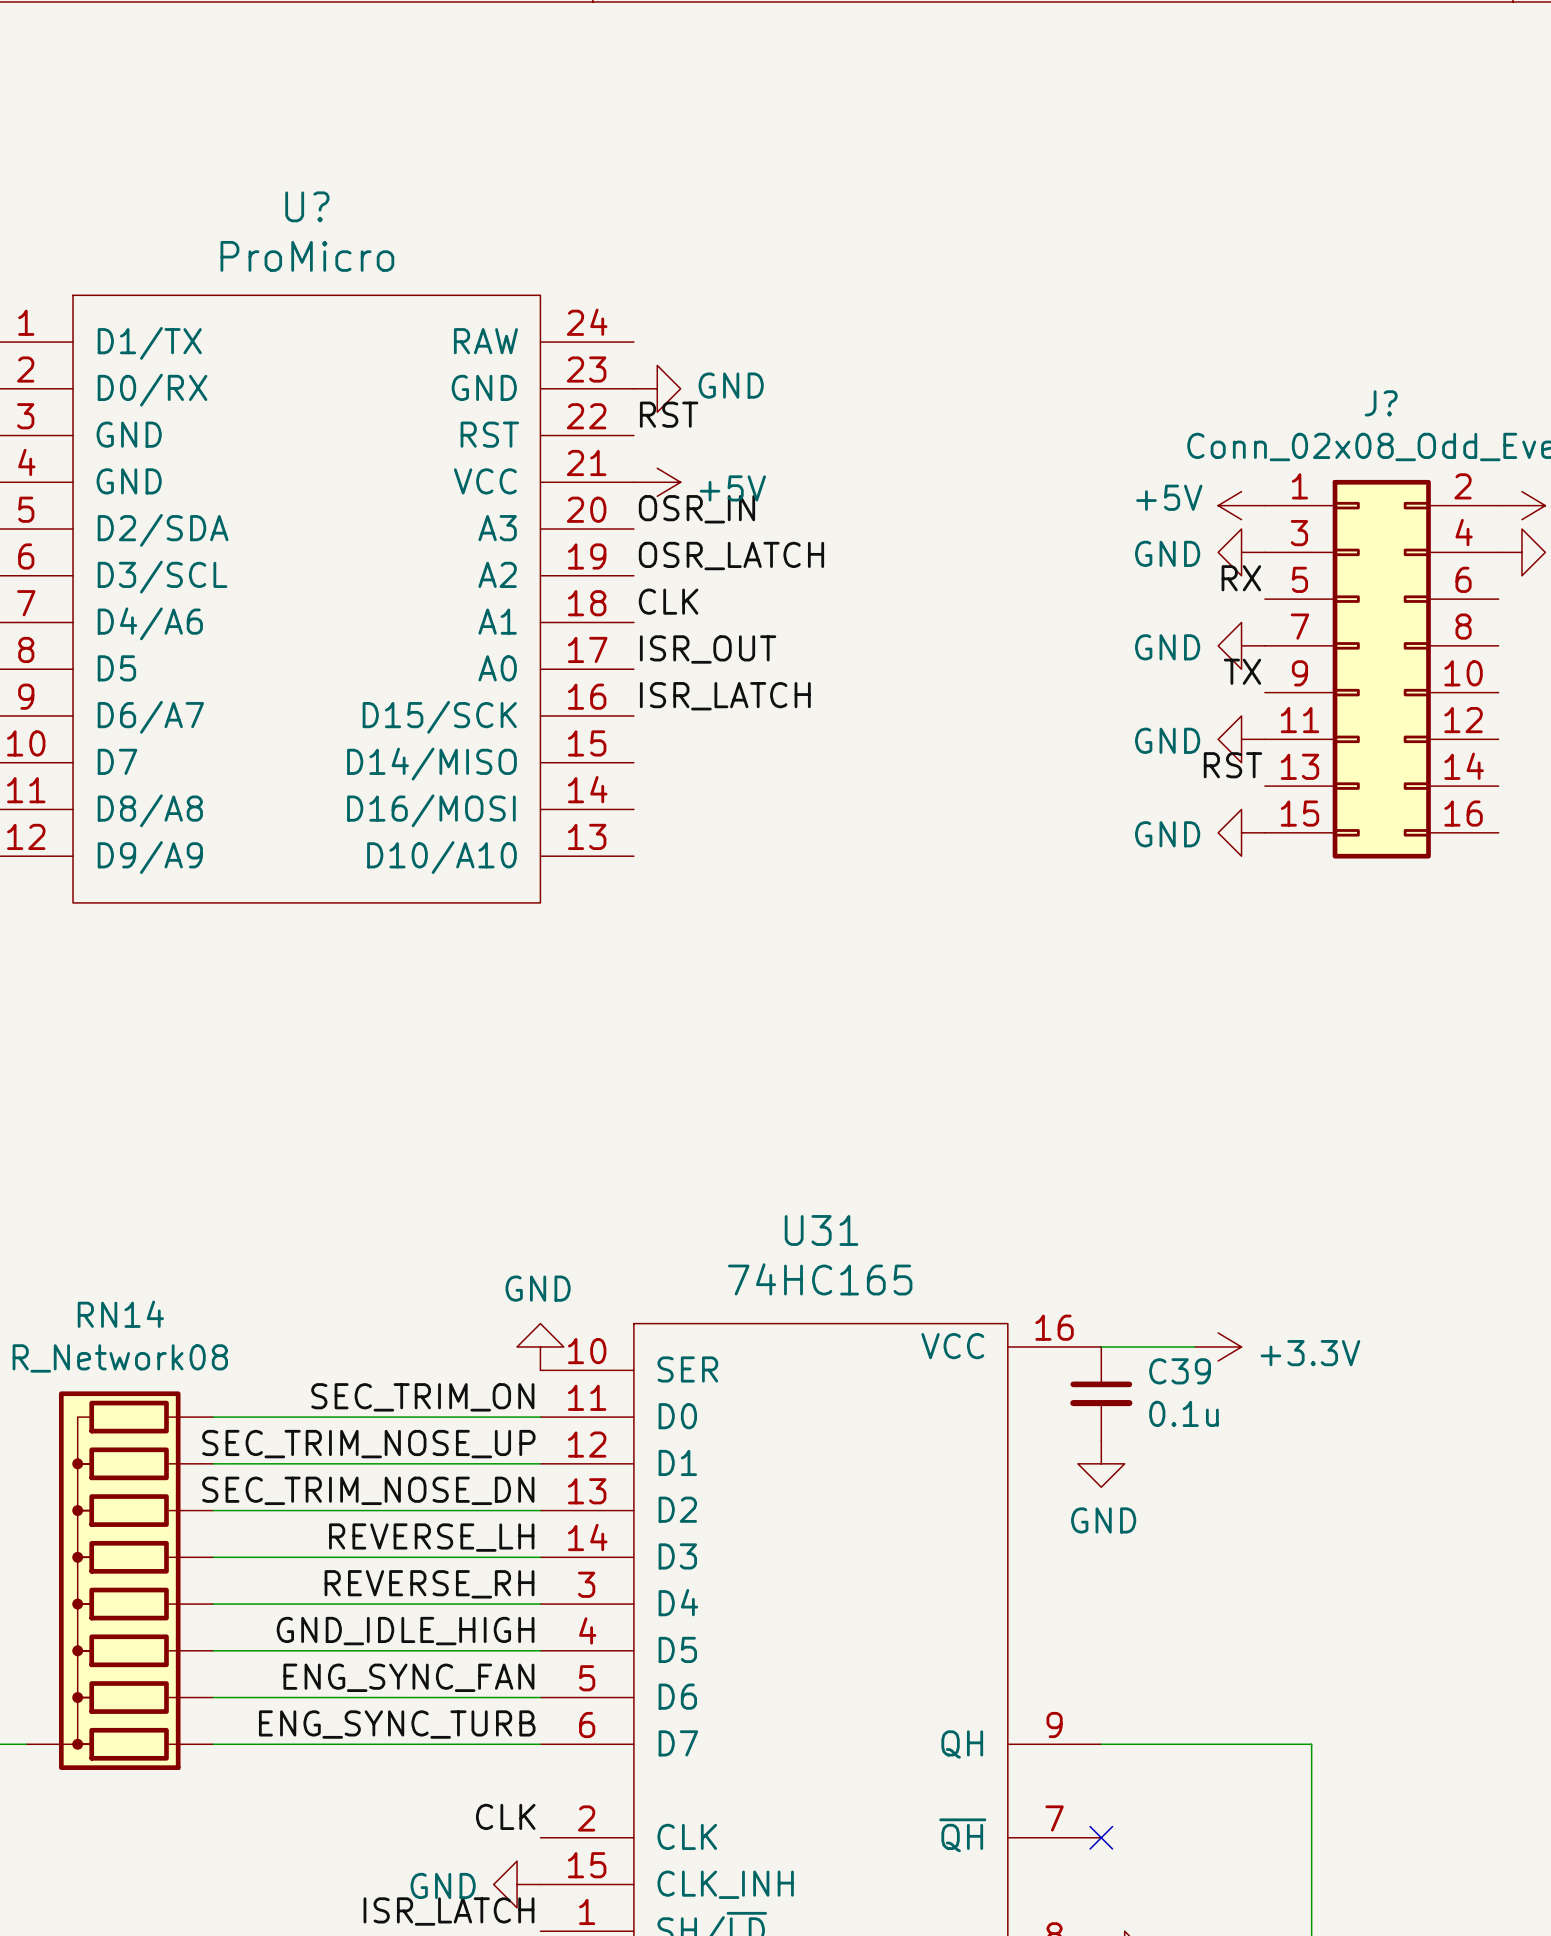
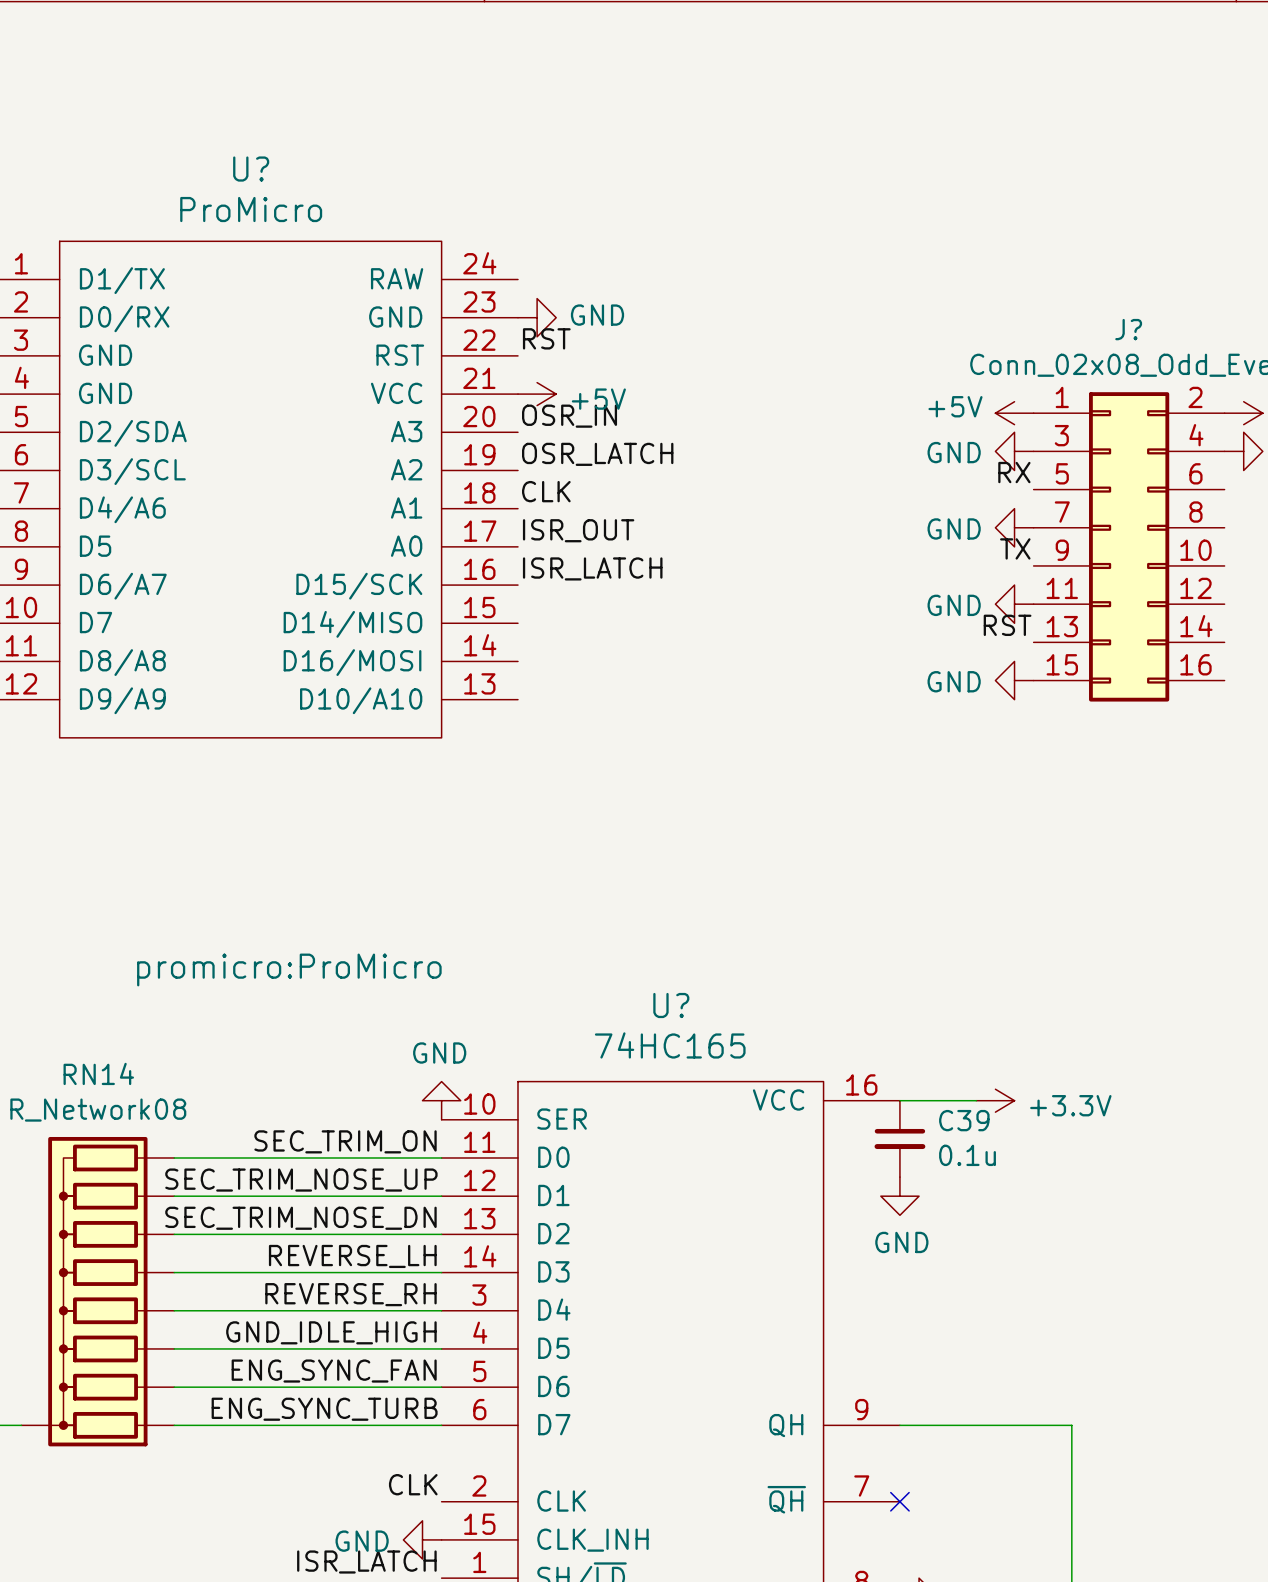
U? text: none -> promicro:ProMicro (289, 969)
U31 name: U31 (821, 1230) -> U? (671, 1005)

